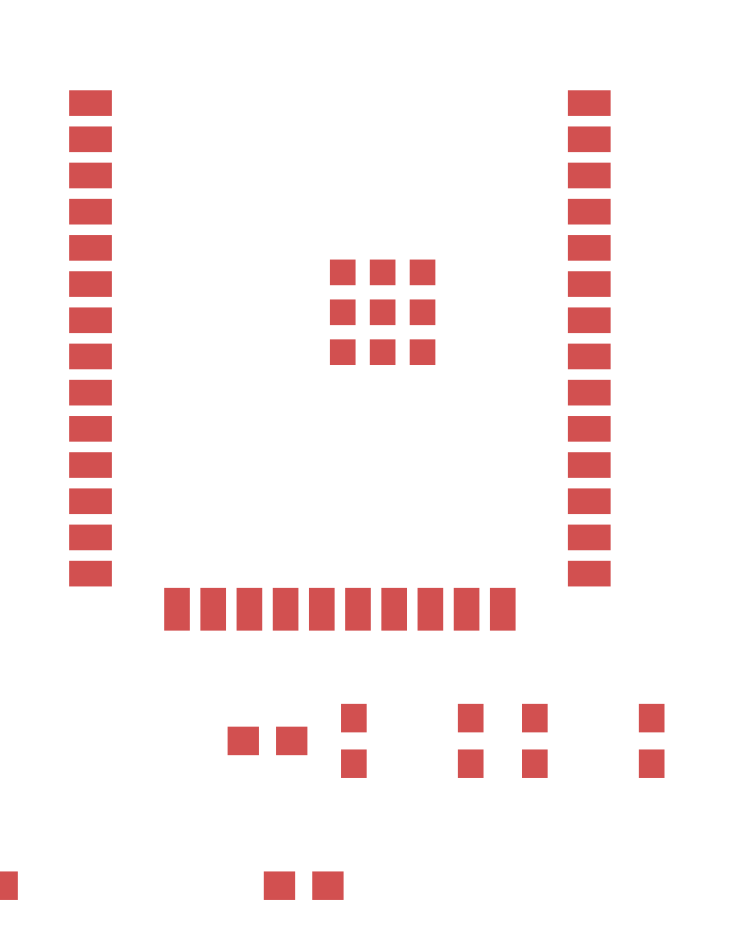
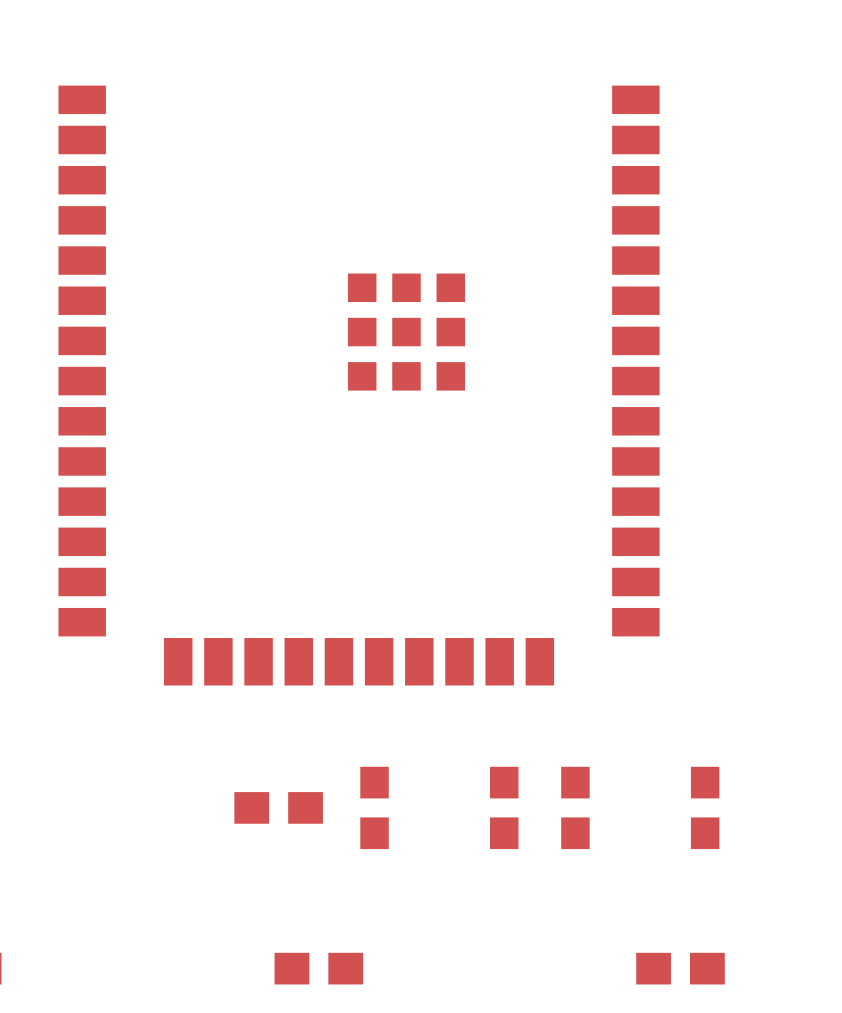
part: none -> (680, 968)

